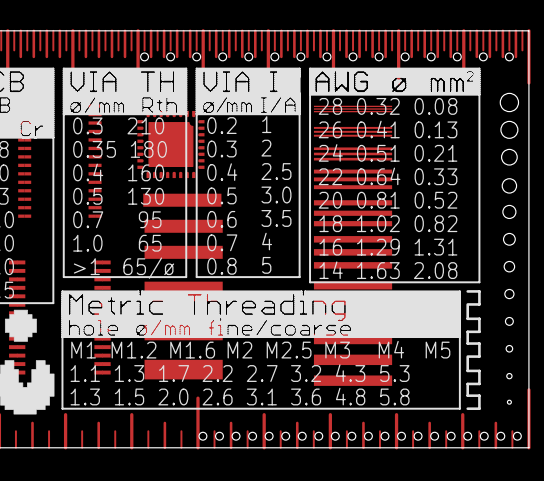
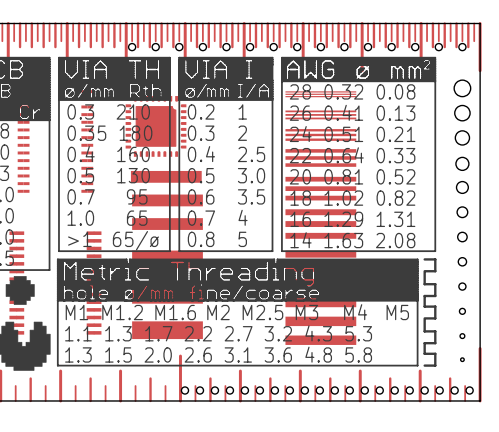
drawing shape: [62, 67, 188, 279] -> [58, 56, 171, 253]
drawing shape: [195, 67, 301, 279] -> [178, 56, 274, 253]

